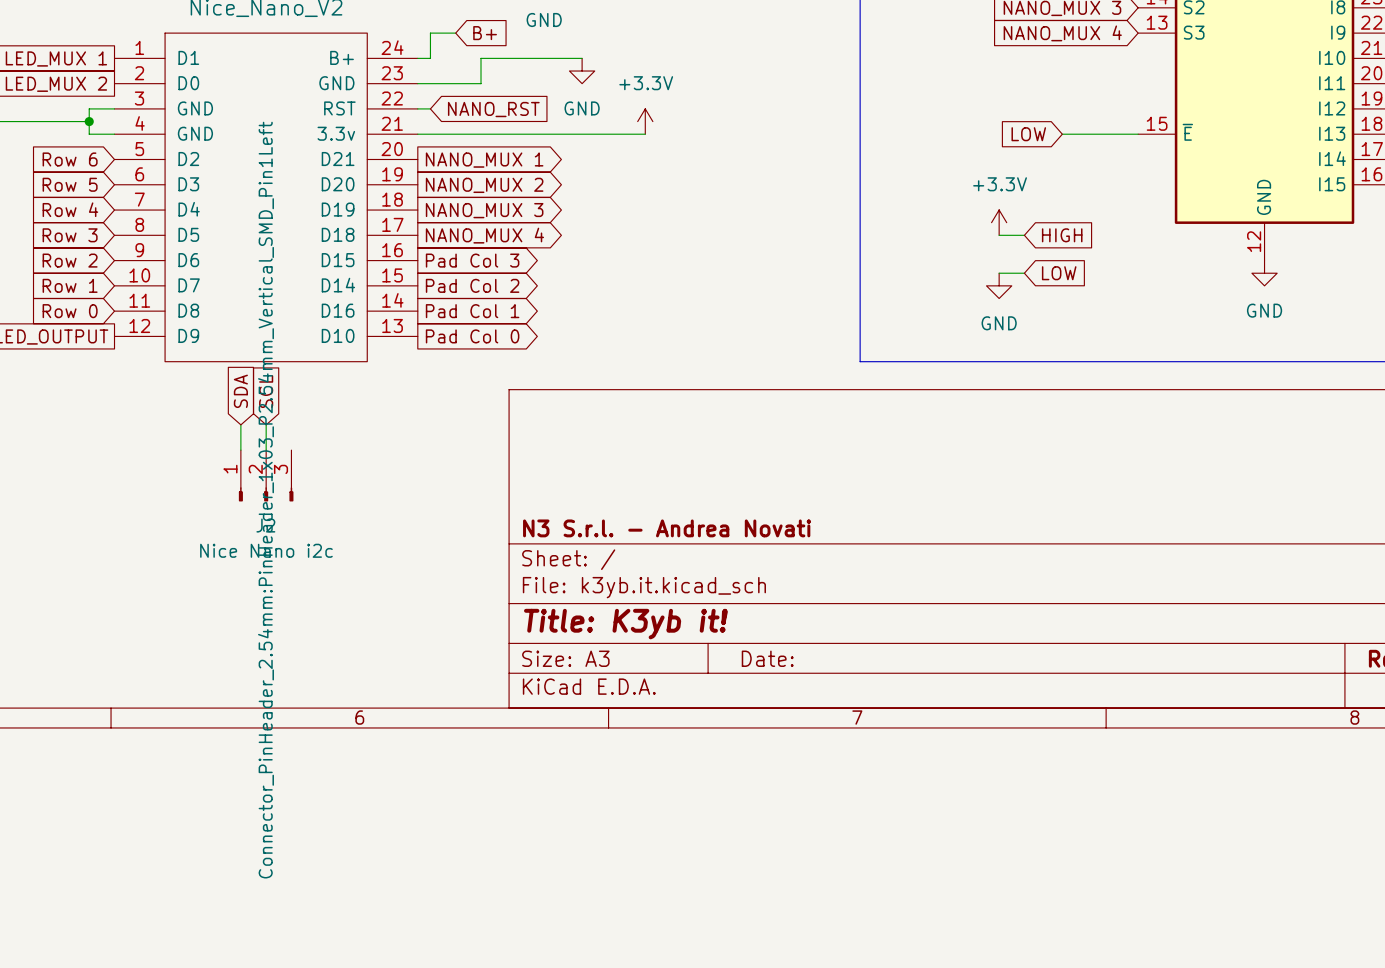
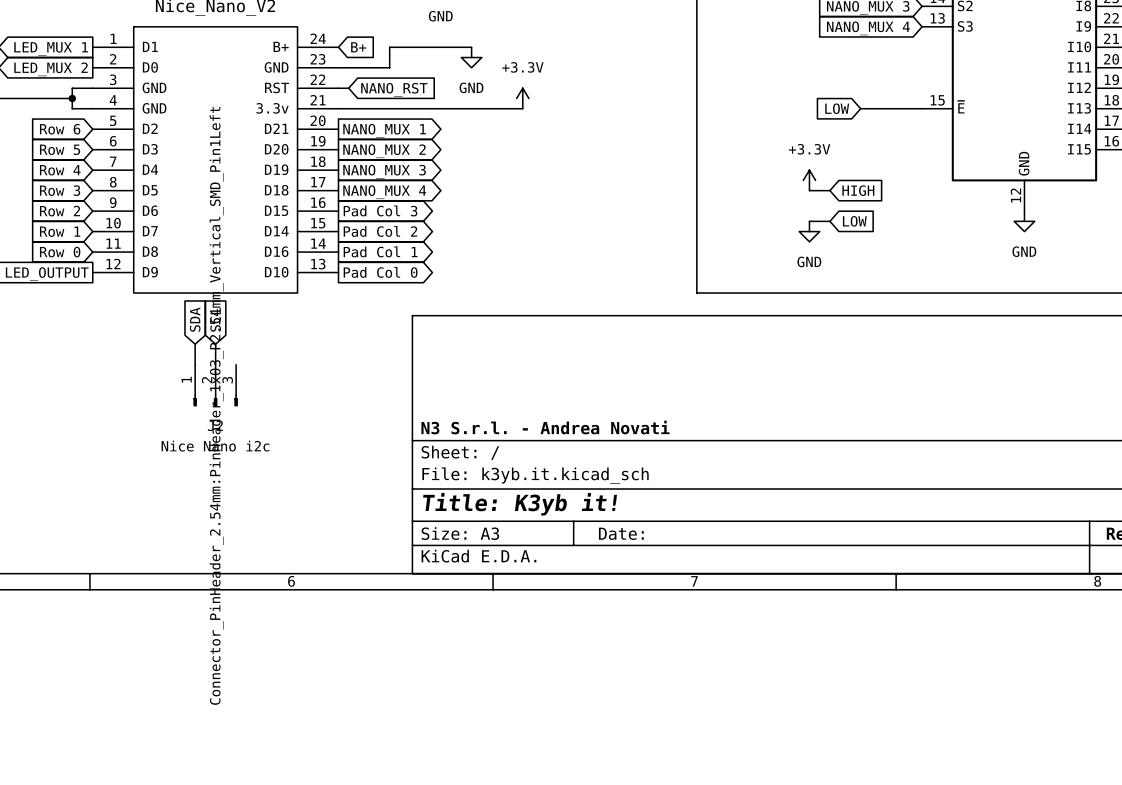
wire: (455, 33) (430, 33) (430, 58) (417, 58) -> none
global label position: B+ (485, 33) -> B+ (358, 47)

